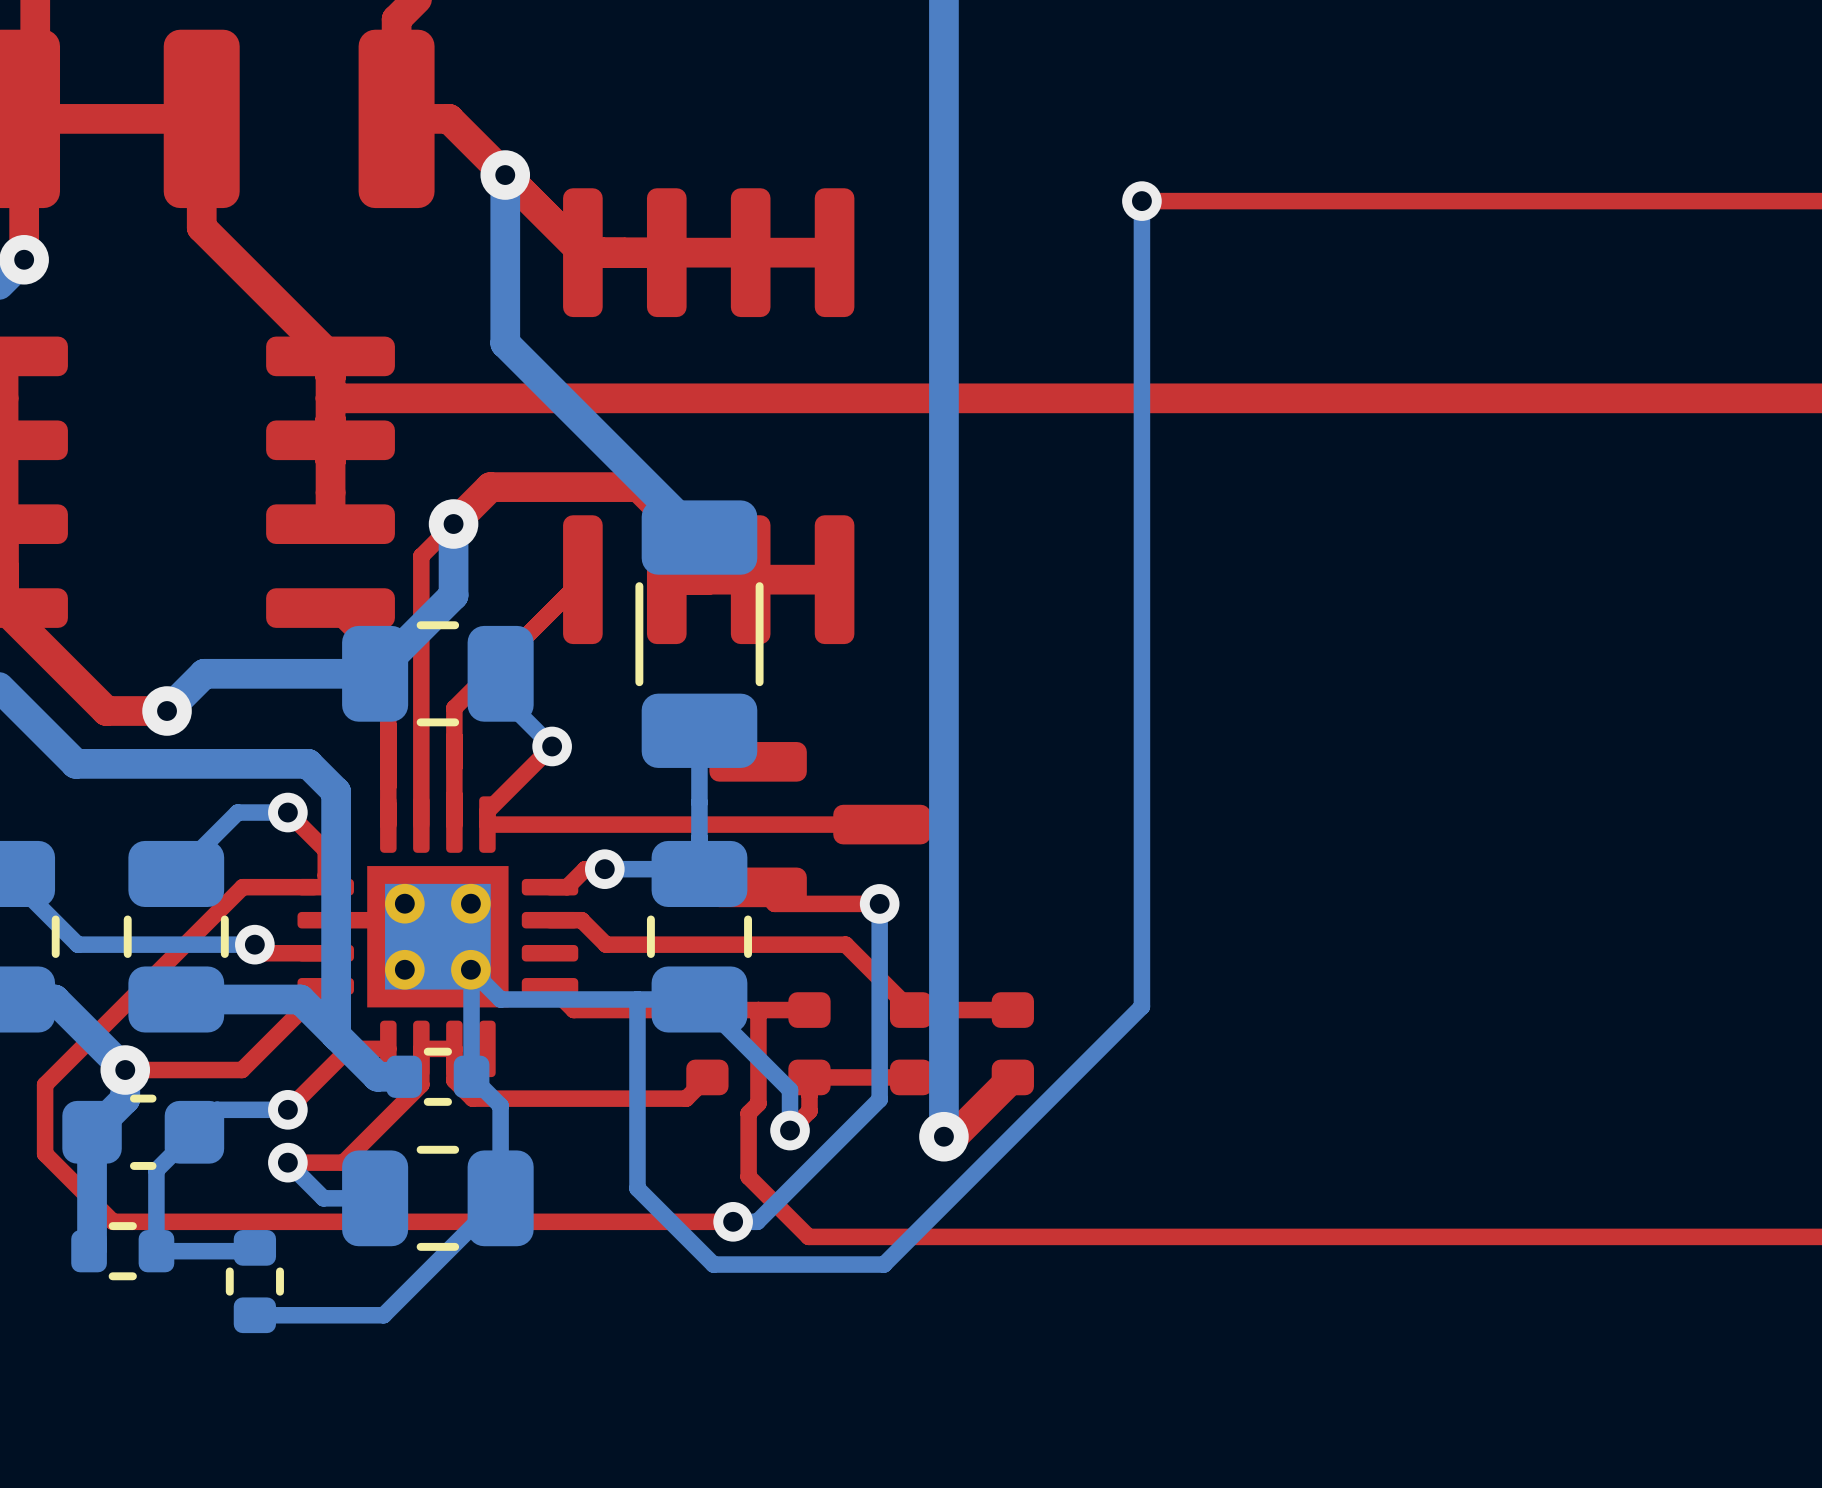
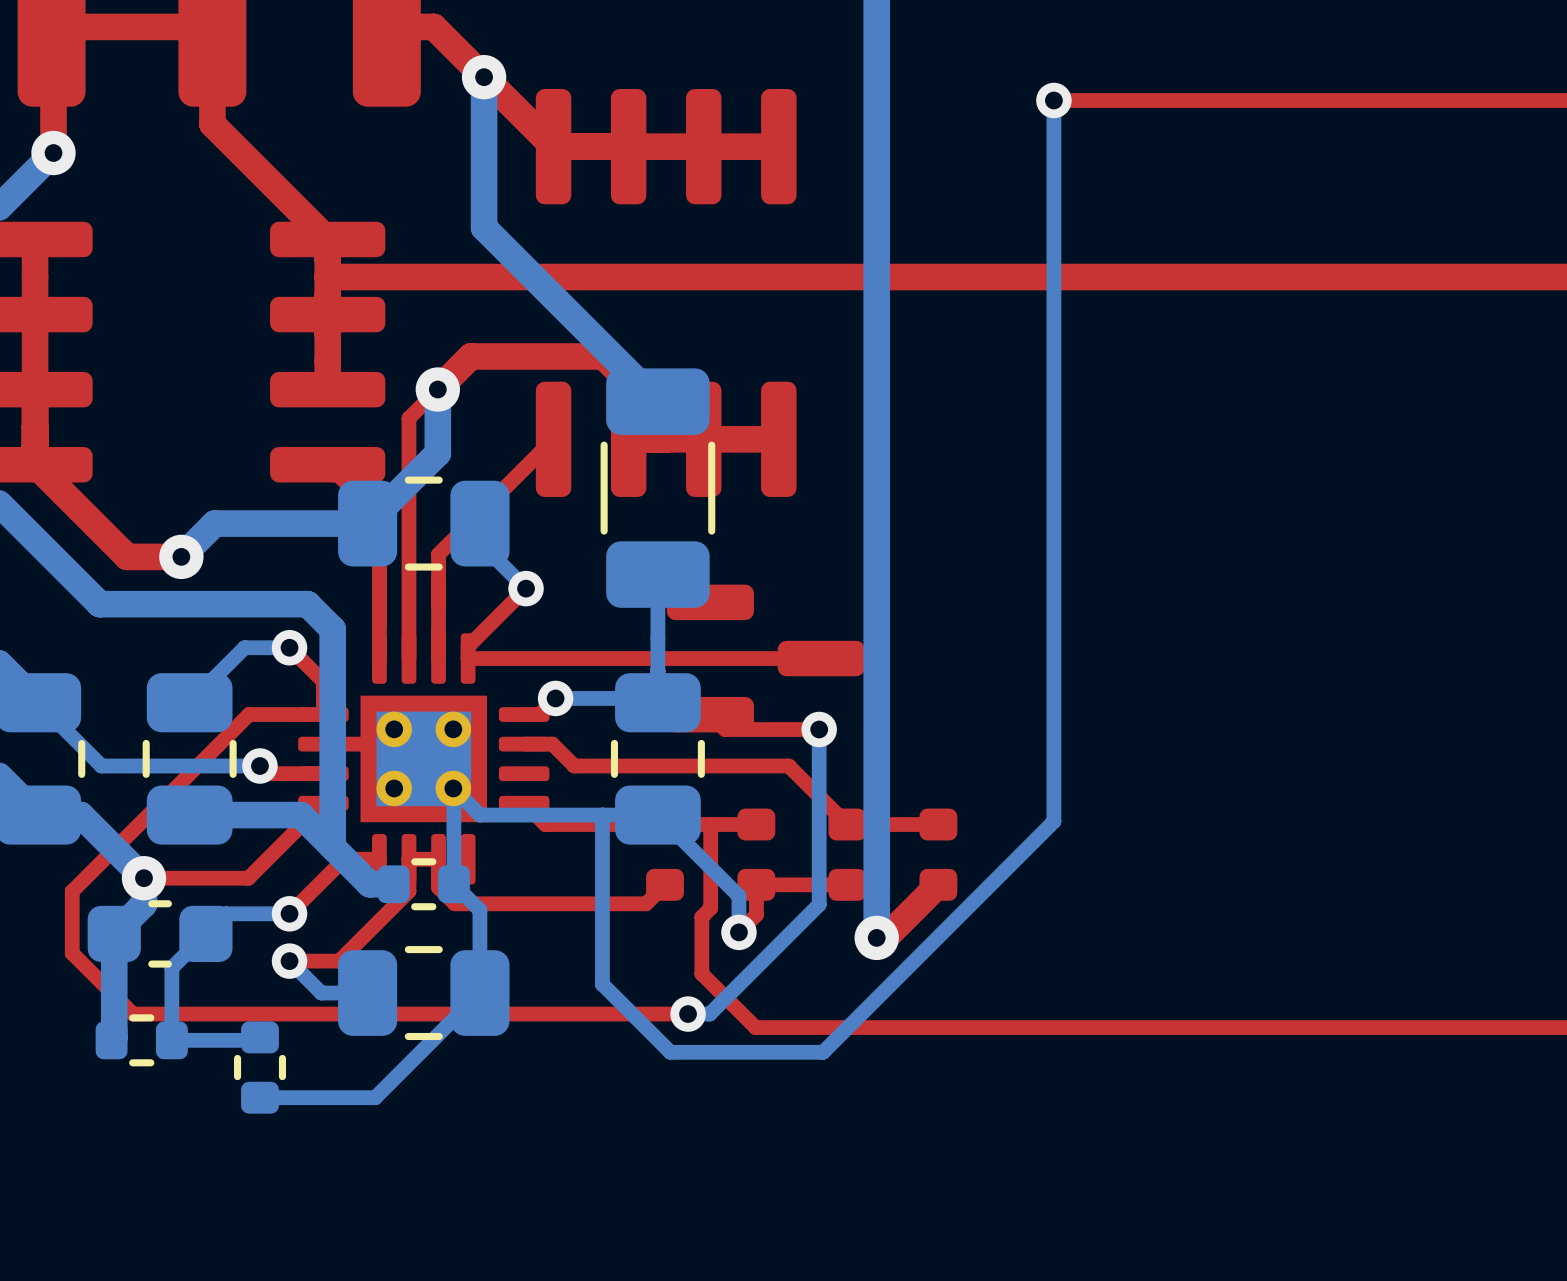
via position: (604, 869) -> (555, 698)

